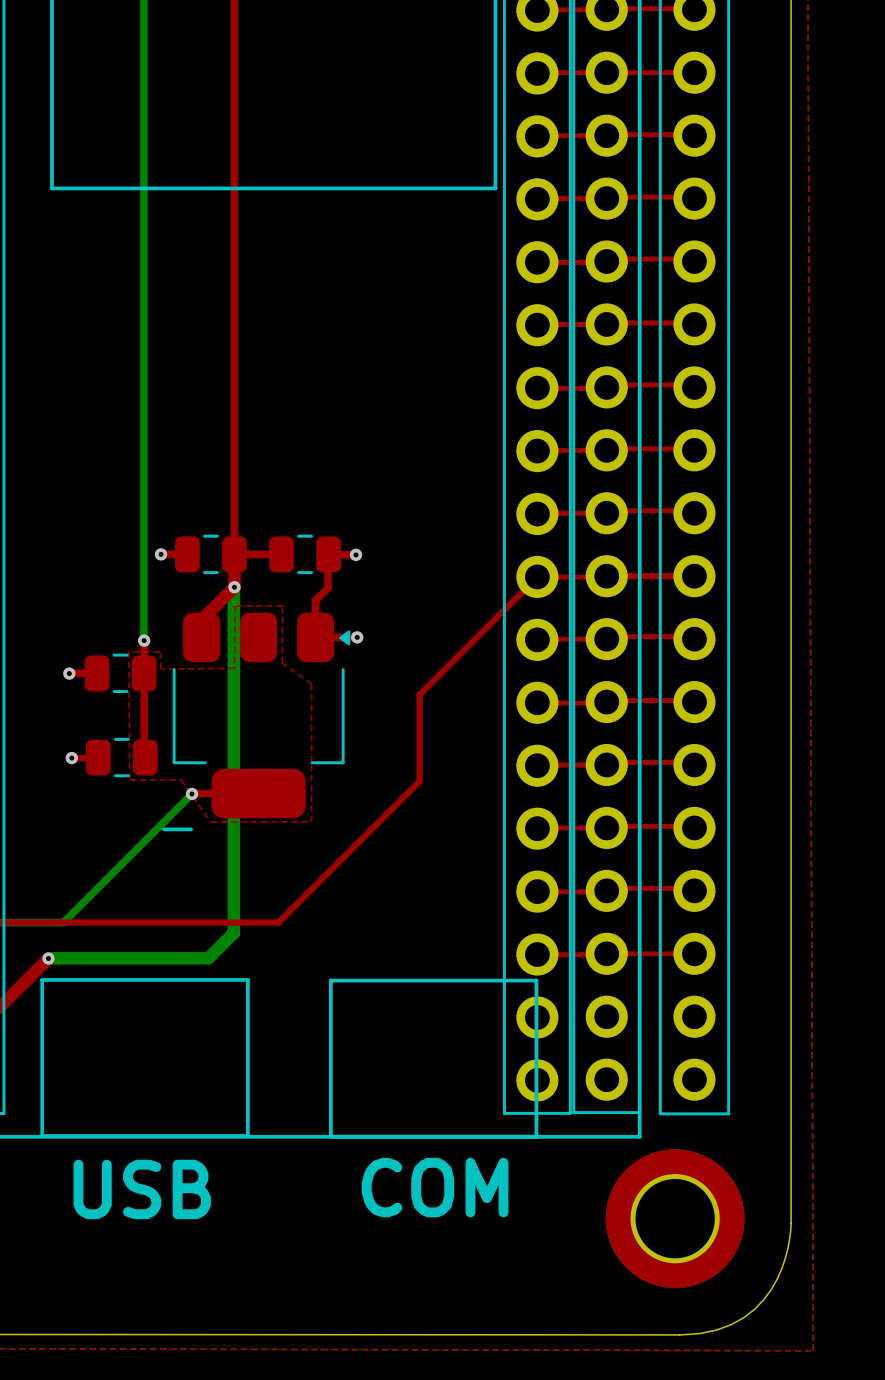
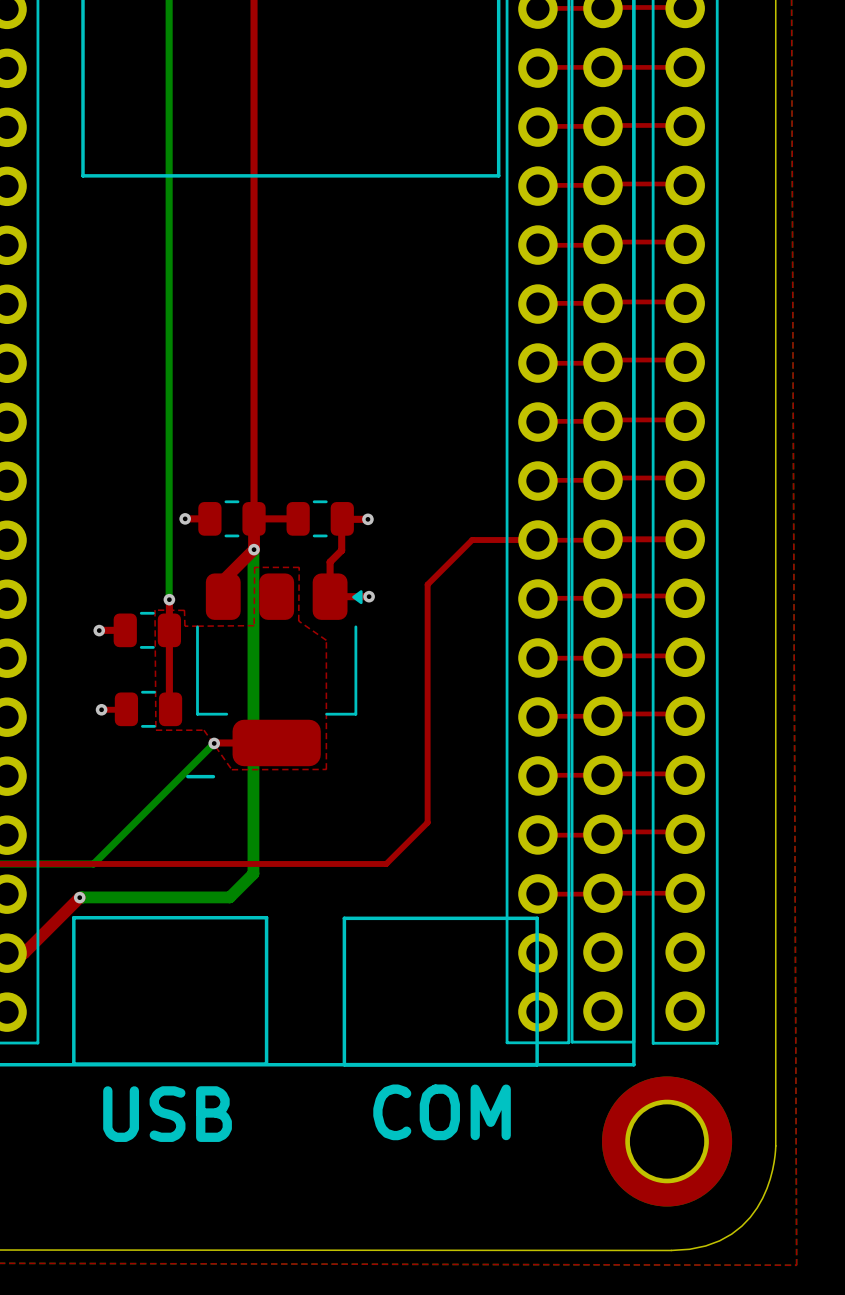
top track: (537, 576) (419, 694) -> (537, 540) (472, 540) (427, 584) (427, 650)
top track: (419, 781) (278, 922) -> (427, 731) (427, 822) (386, 863) (295, 863)

